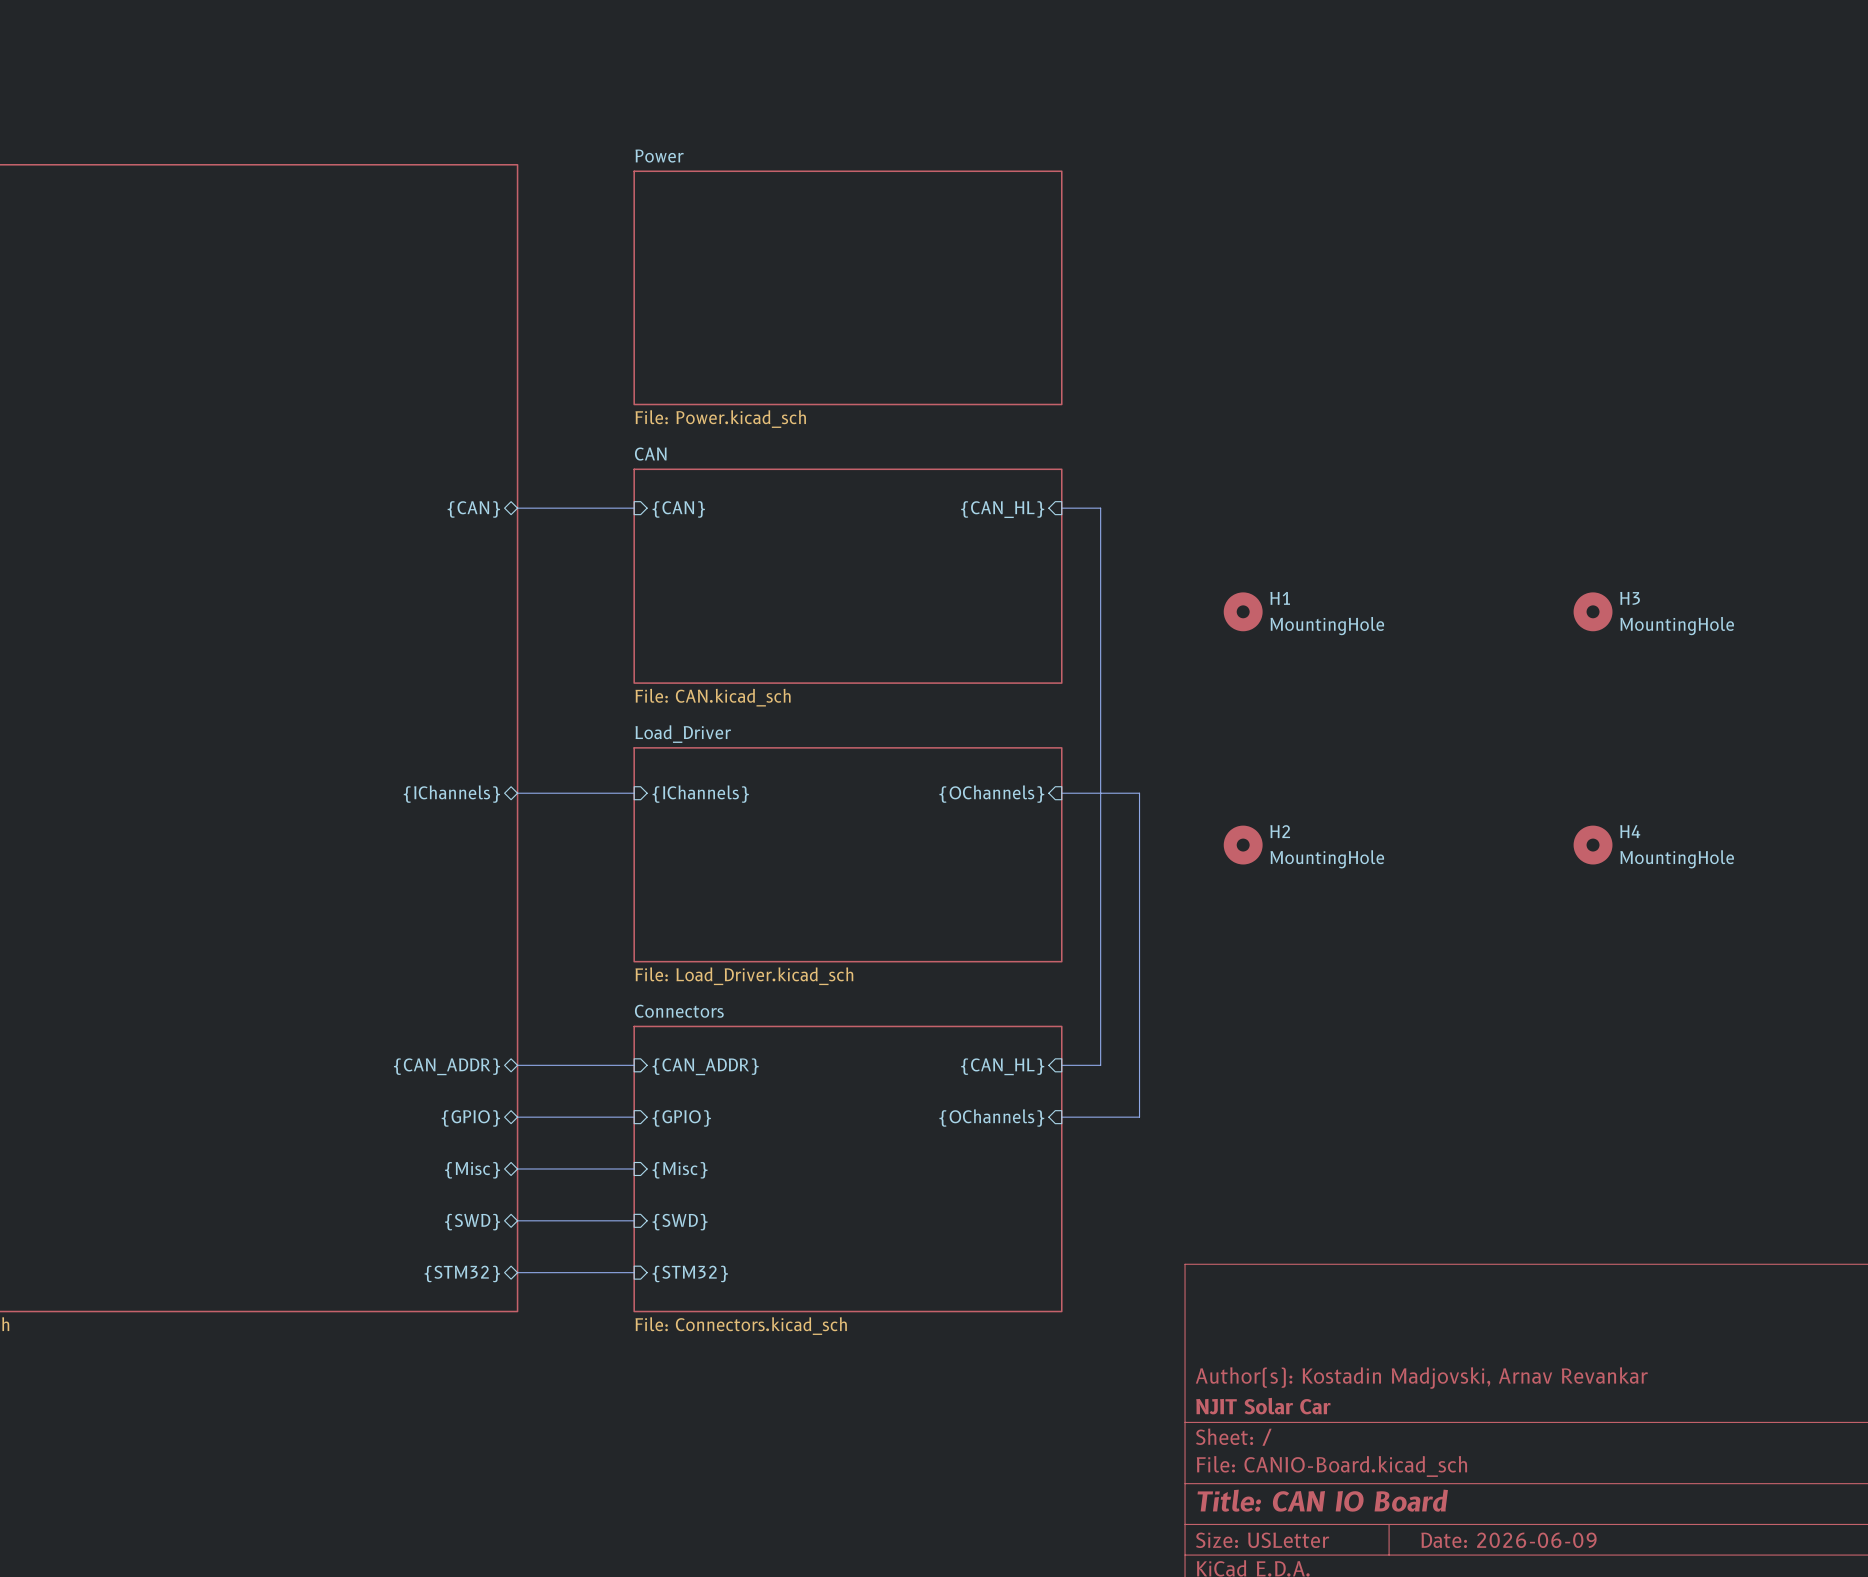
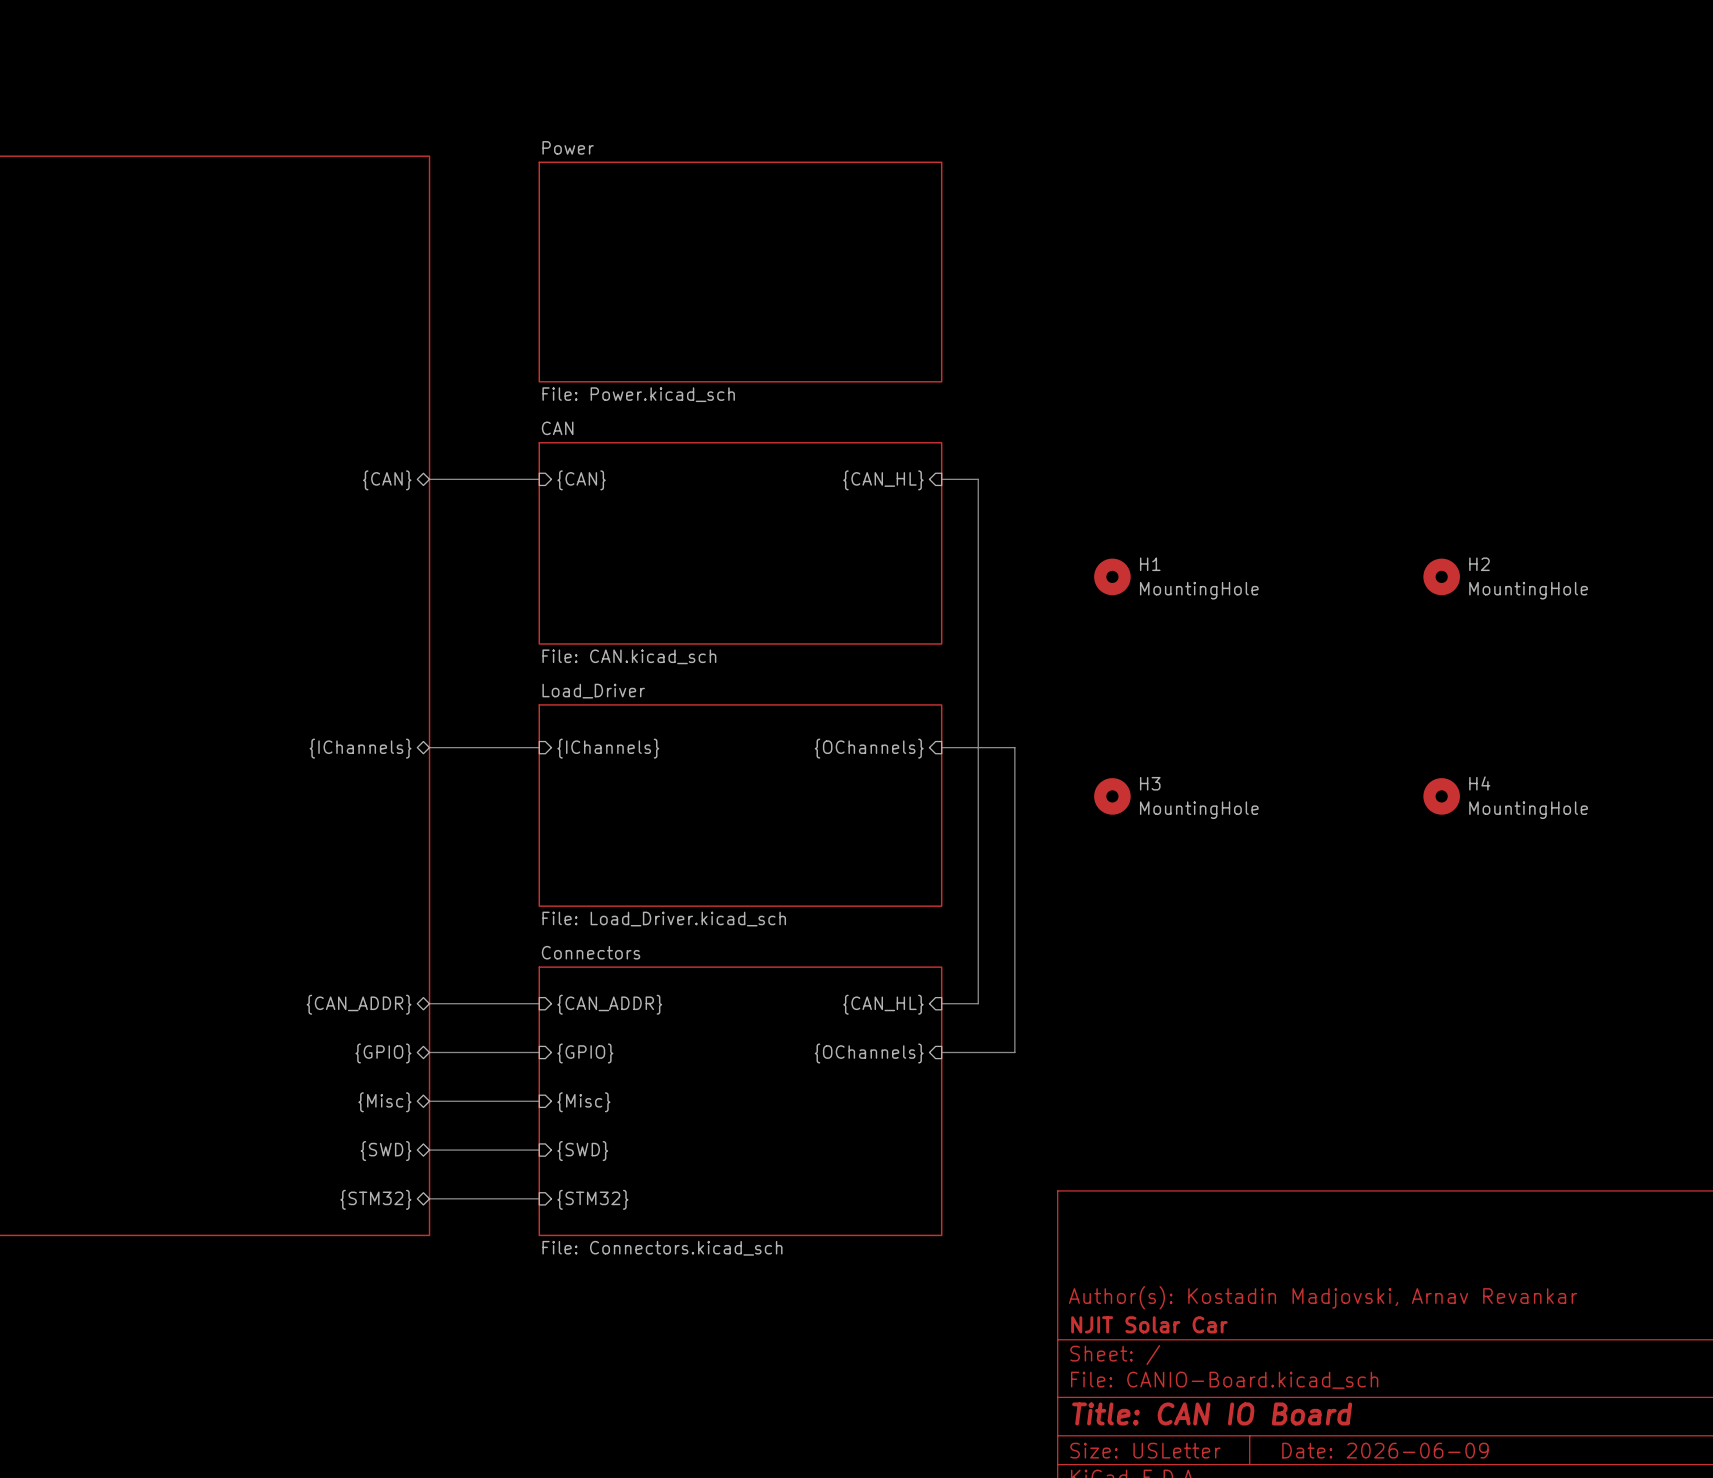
H3 name: H3 (1630, 598) -> H2 (1479, 564)
H2 name: H2 (1280, 831) -> H3 (1150, 783)

